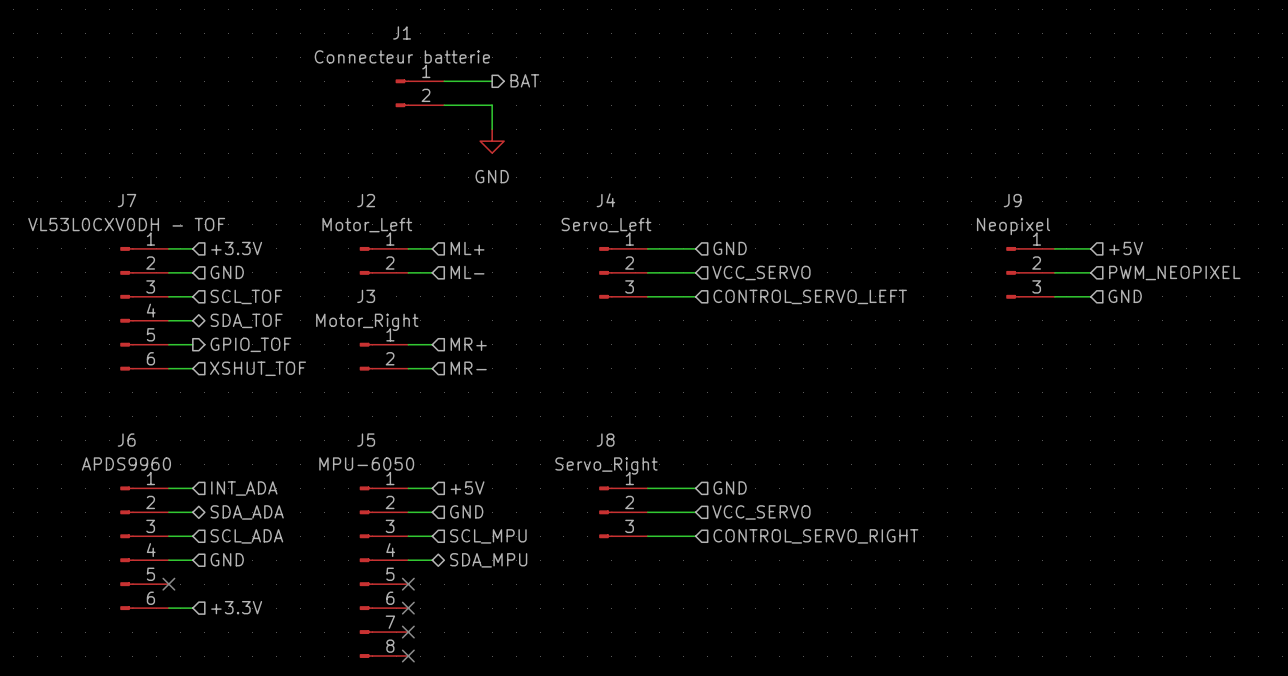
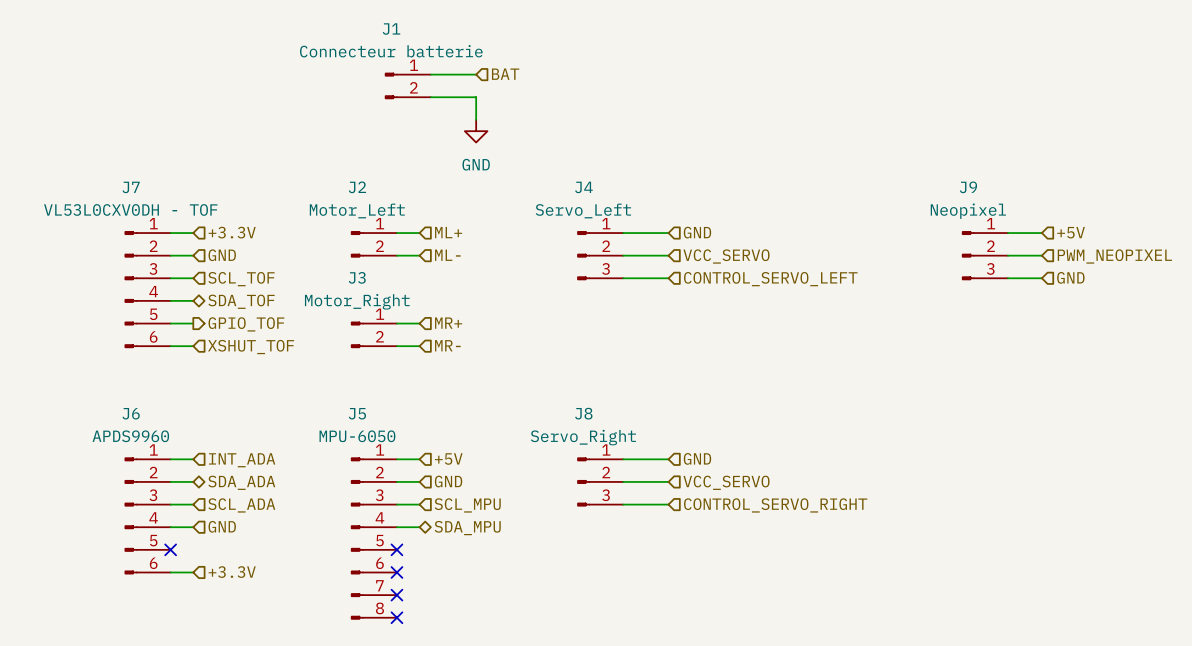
hierarchical label shape: output (524, 80) -> input (505, 74)

